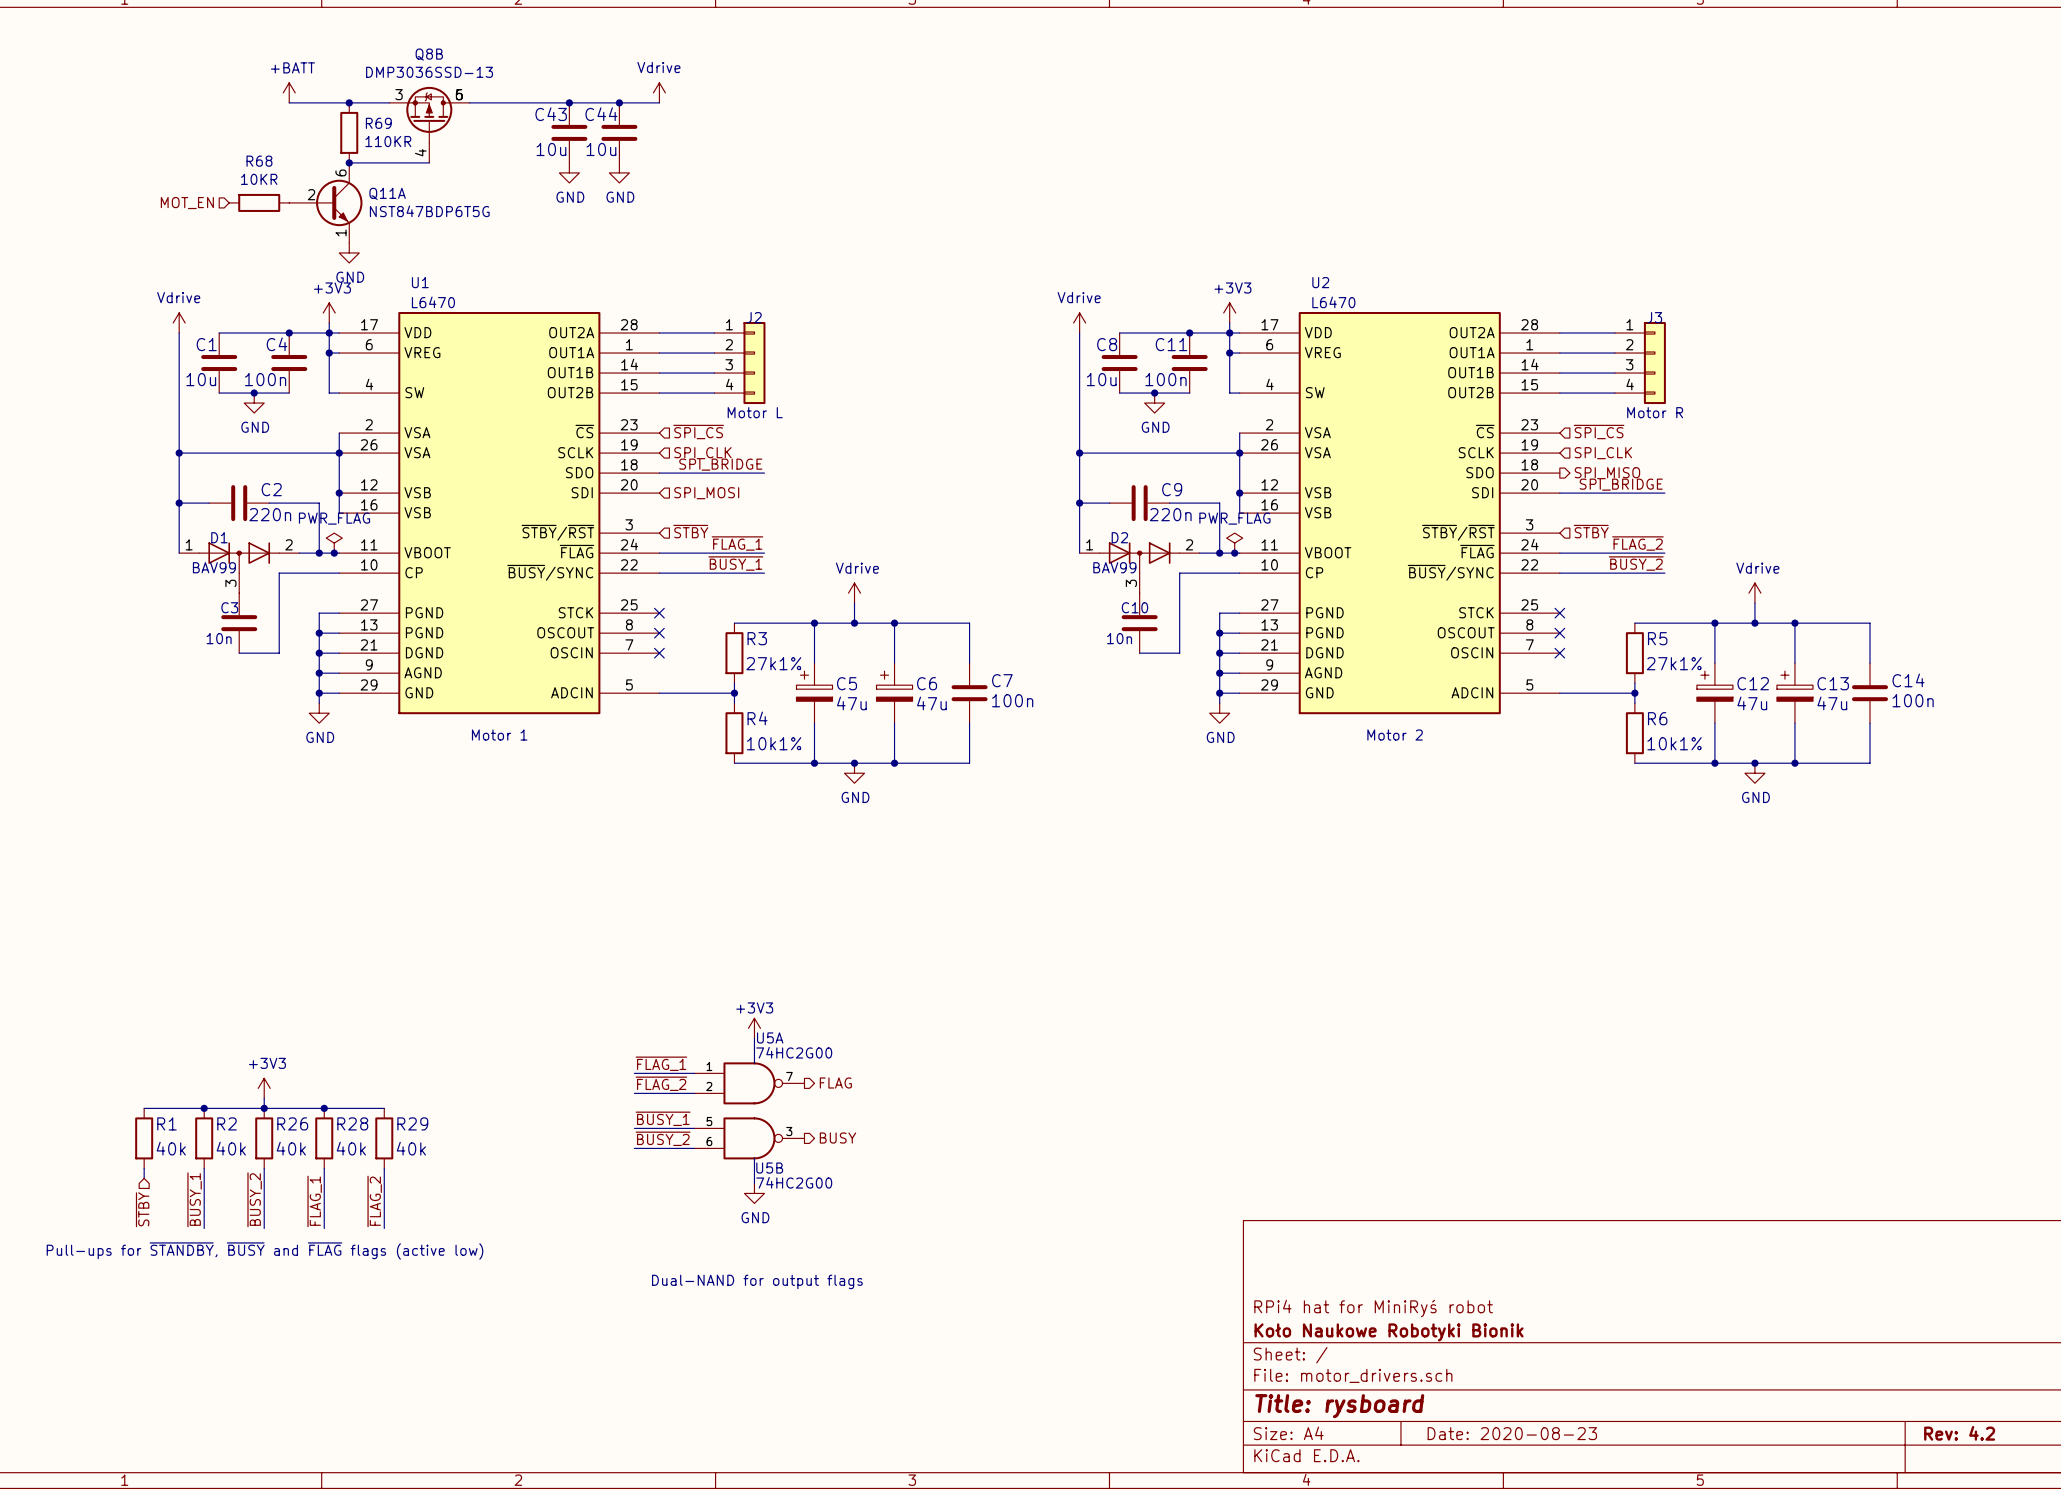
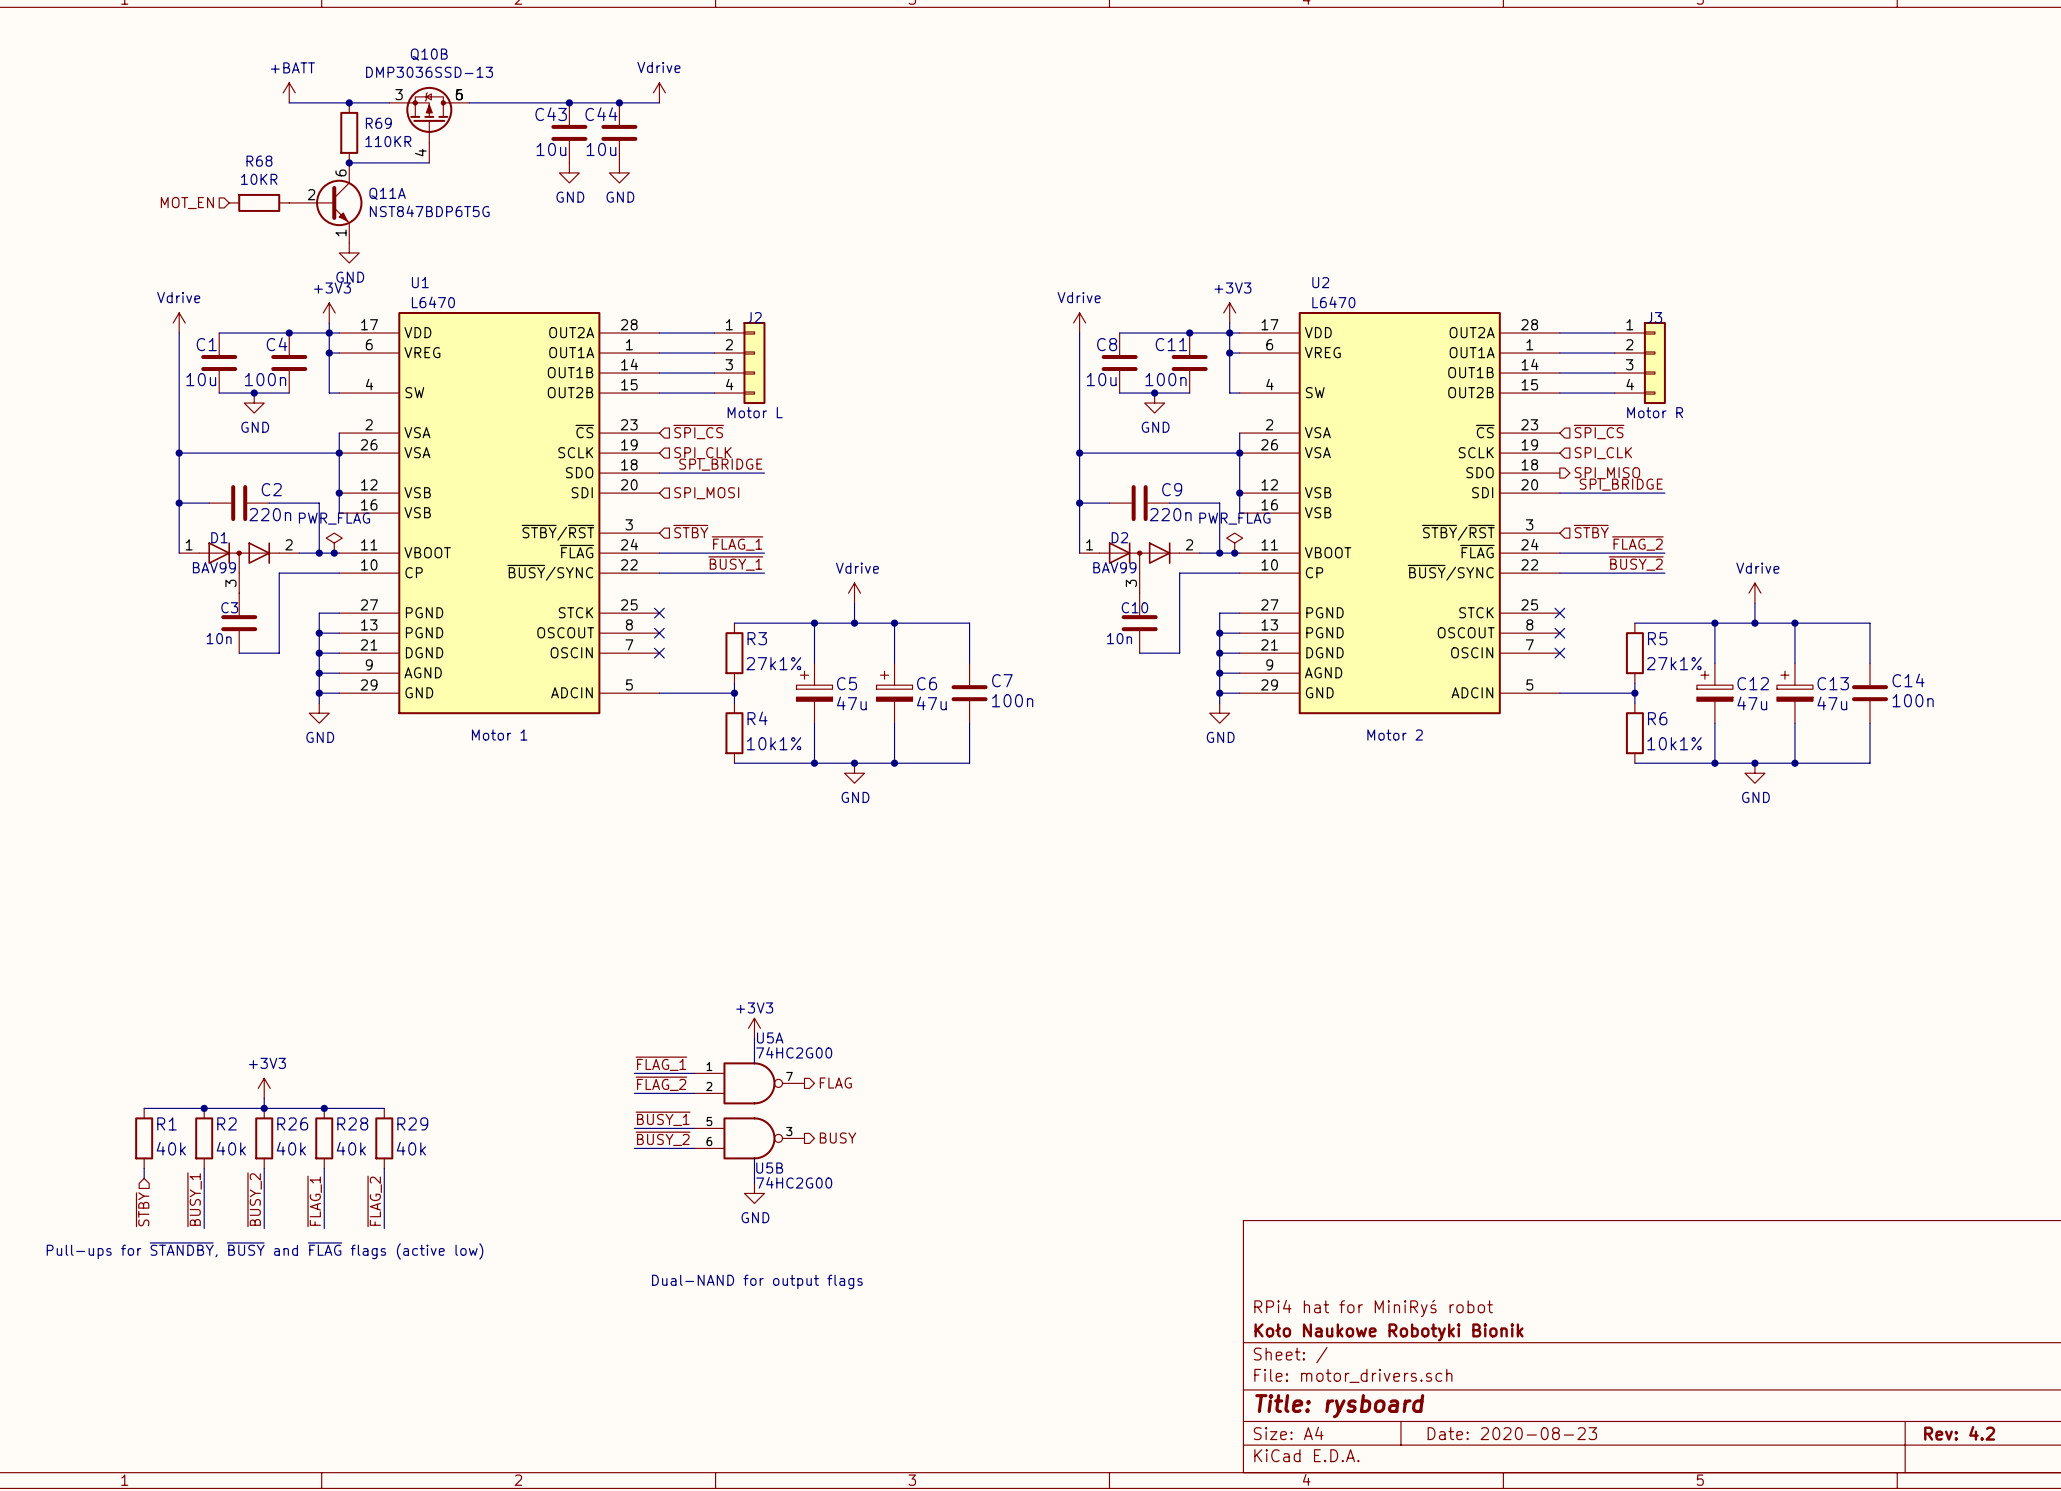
Q8B name: Q8B (429, 54) -> Q10B (429, 54)

